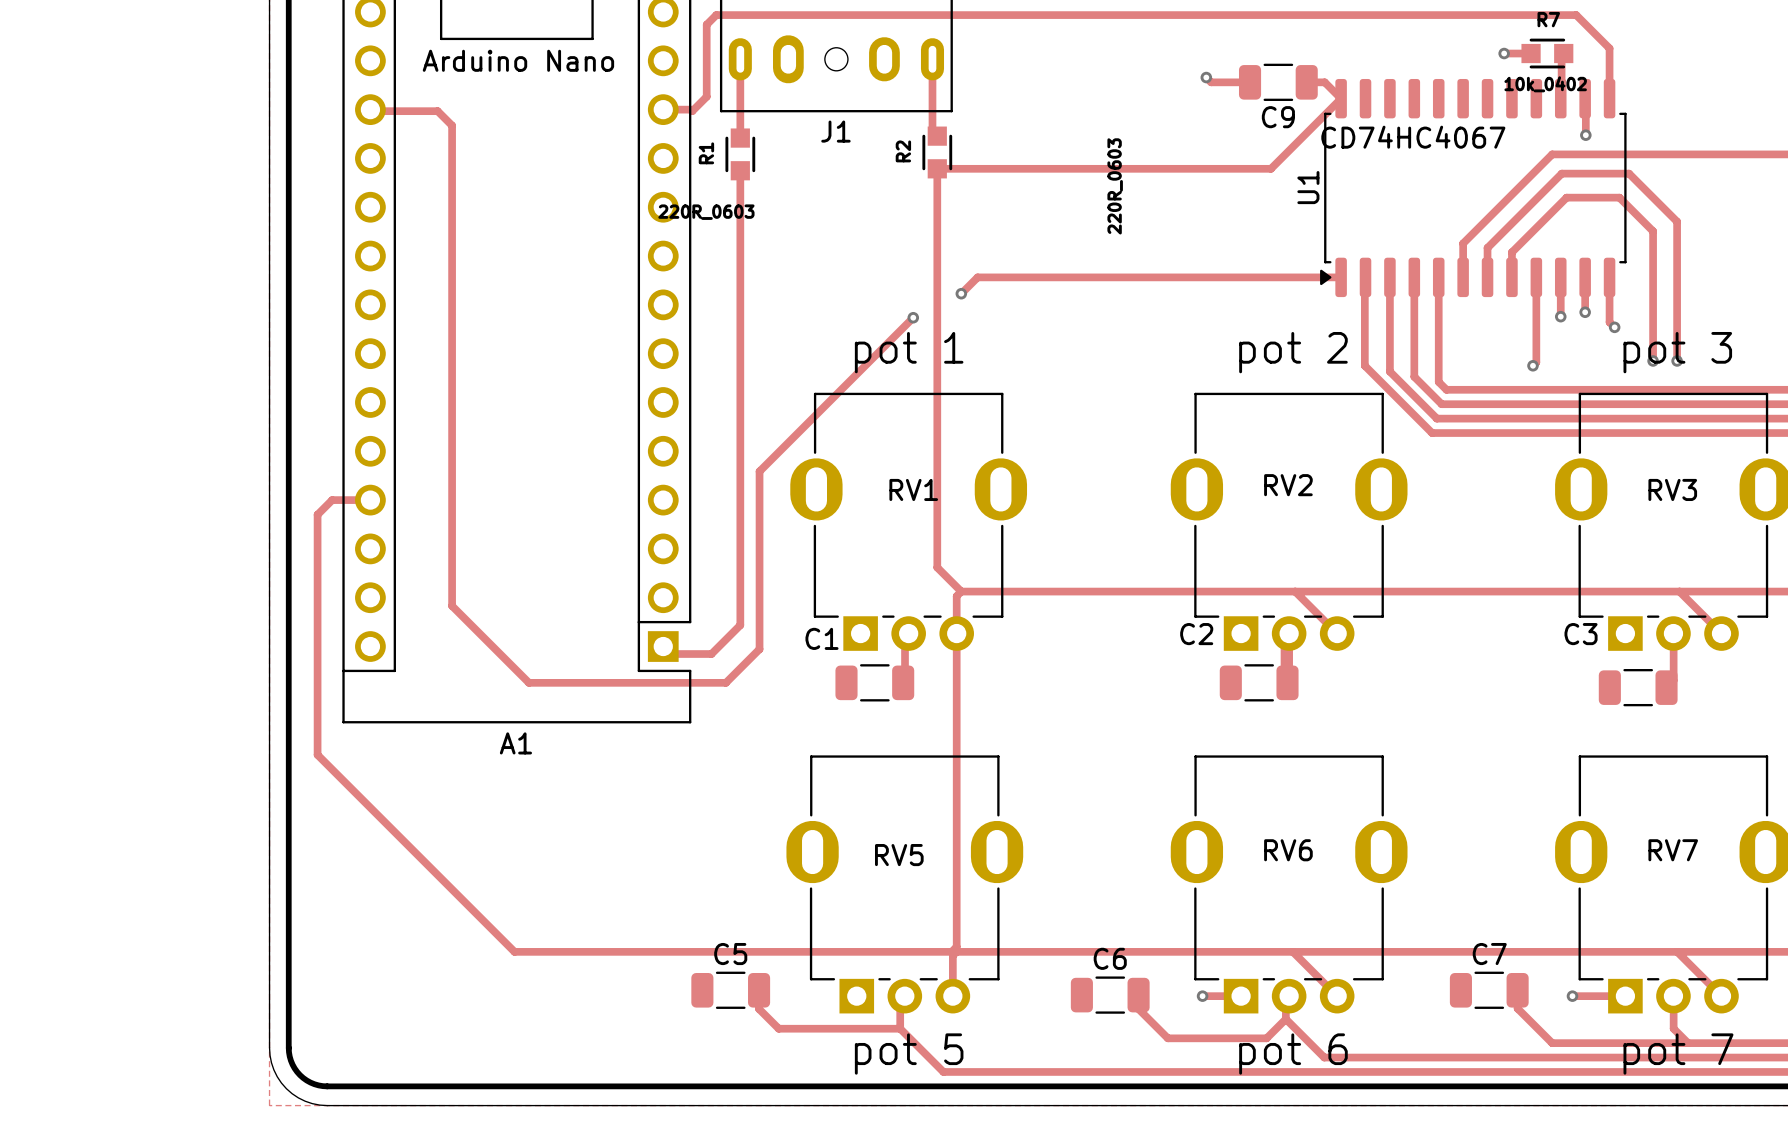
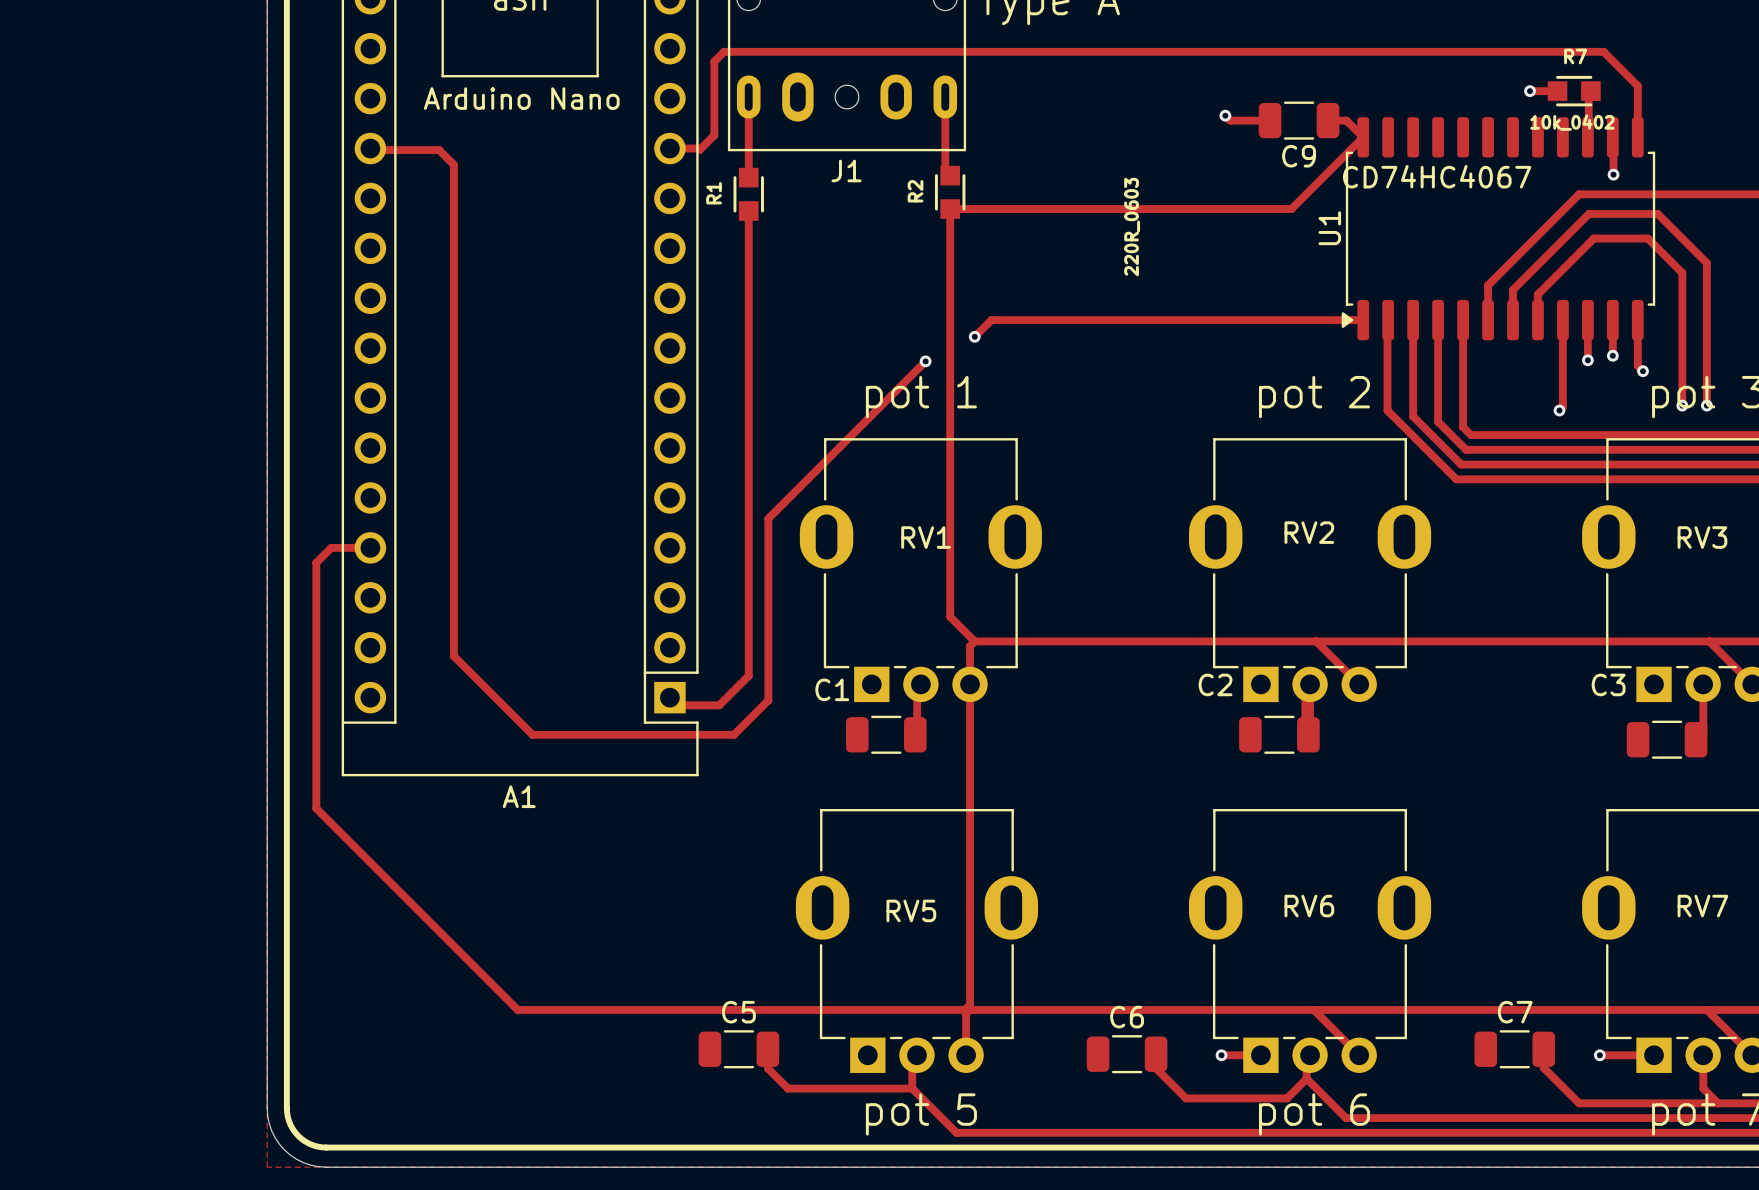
R1 value: 220R_0603 (706, 212) -> none

